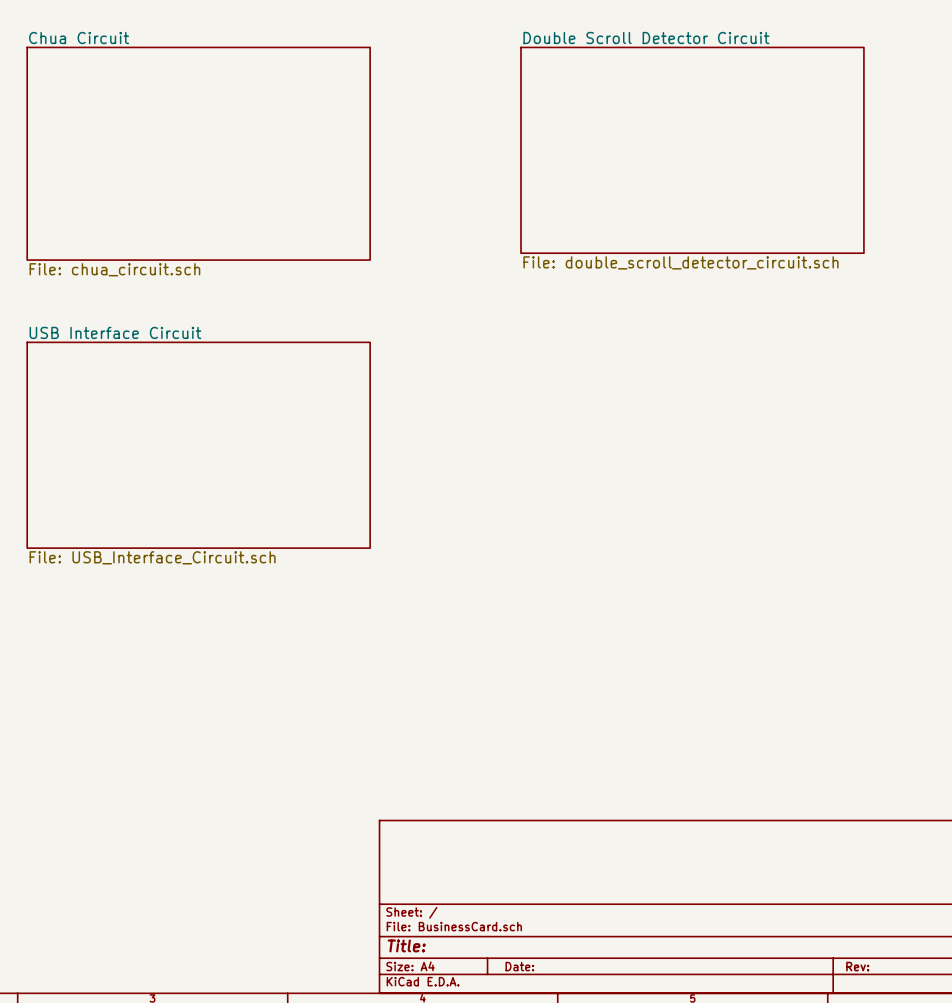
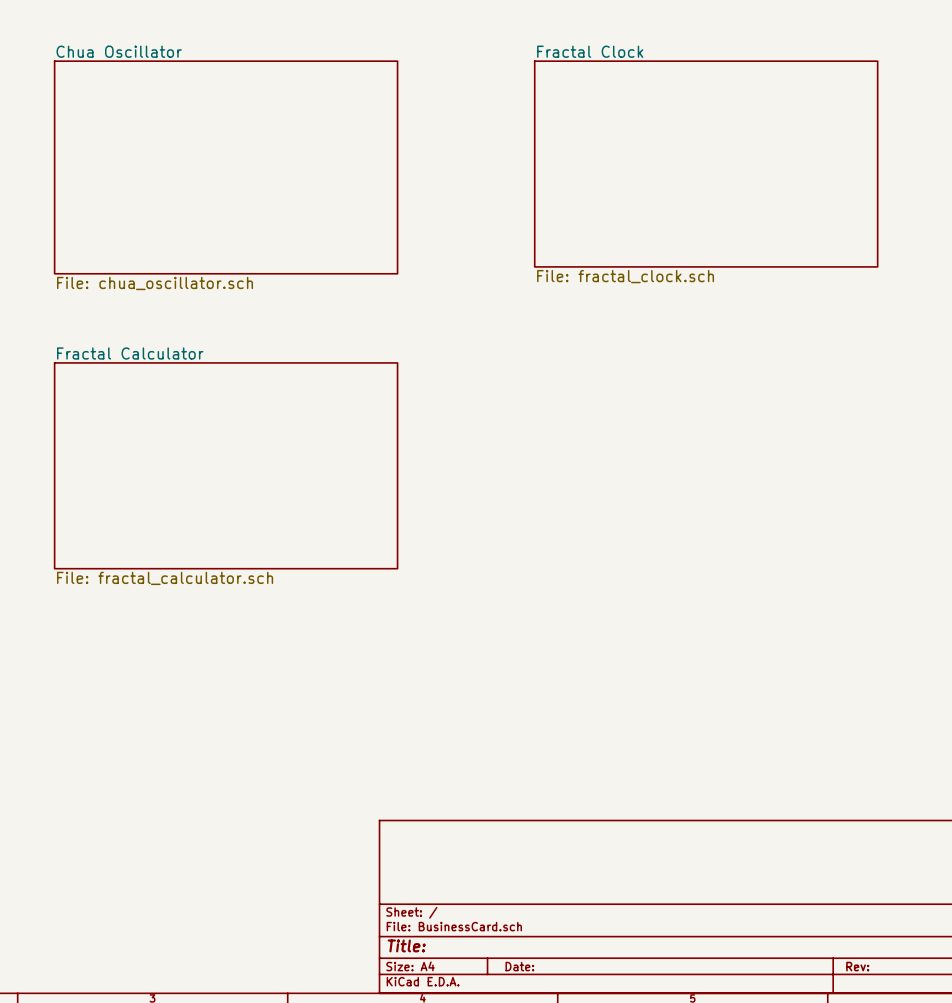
sheet Double Scroll Detector Circuit: File: double_scroll_detector_circuit.sch (692, 150) -> none
sheet Chua Circuit: File: chua_circuit.sch (198, 153) -> none
sheet Fractal Clock: none -> File: fractal_clock.sch (706, 164)
sheet Chua Oscillator: none -> File: chua_oscillator.sch (226, 167)
sheet USB Interface Circuit: File: USB_Interface_Circuit.sch (198, 445) -> none
sheet Fractal Calculator: none -> File: fractal_calculator.sch (226, 465)

